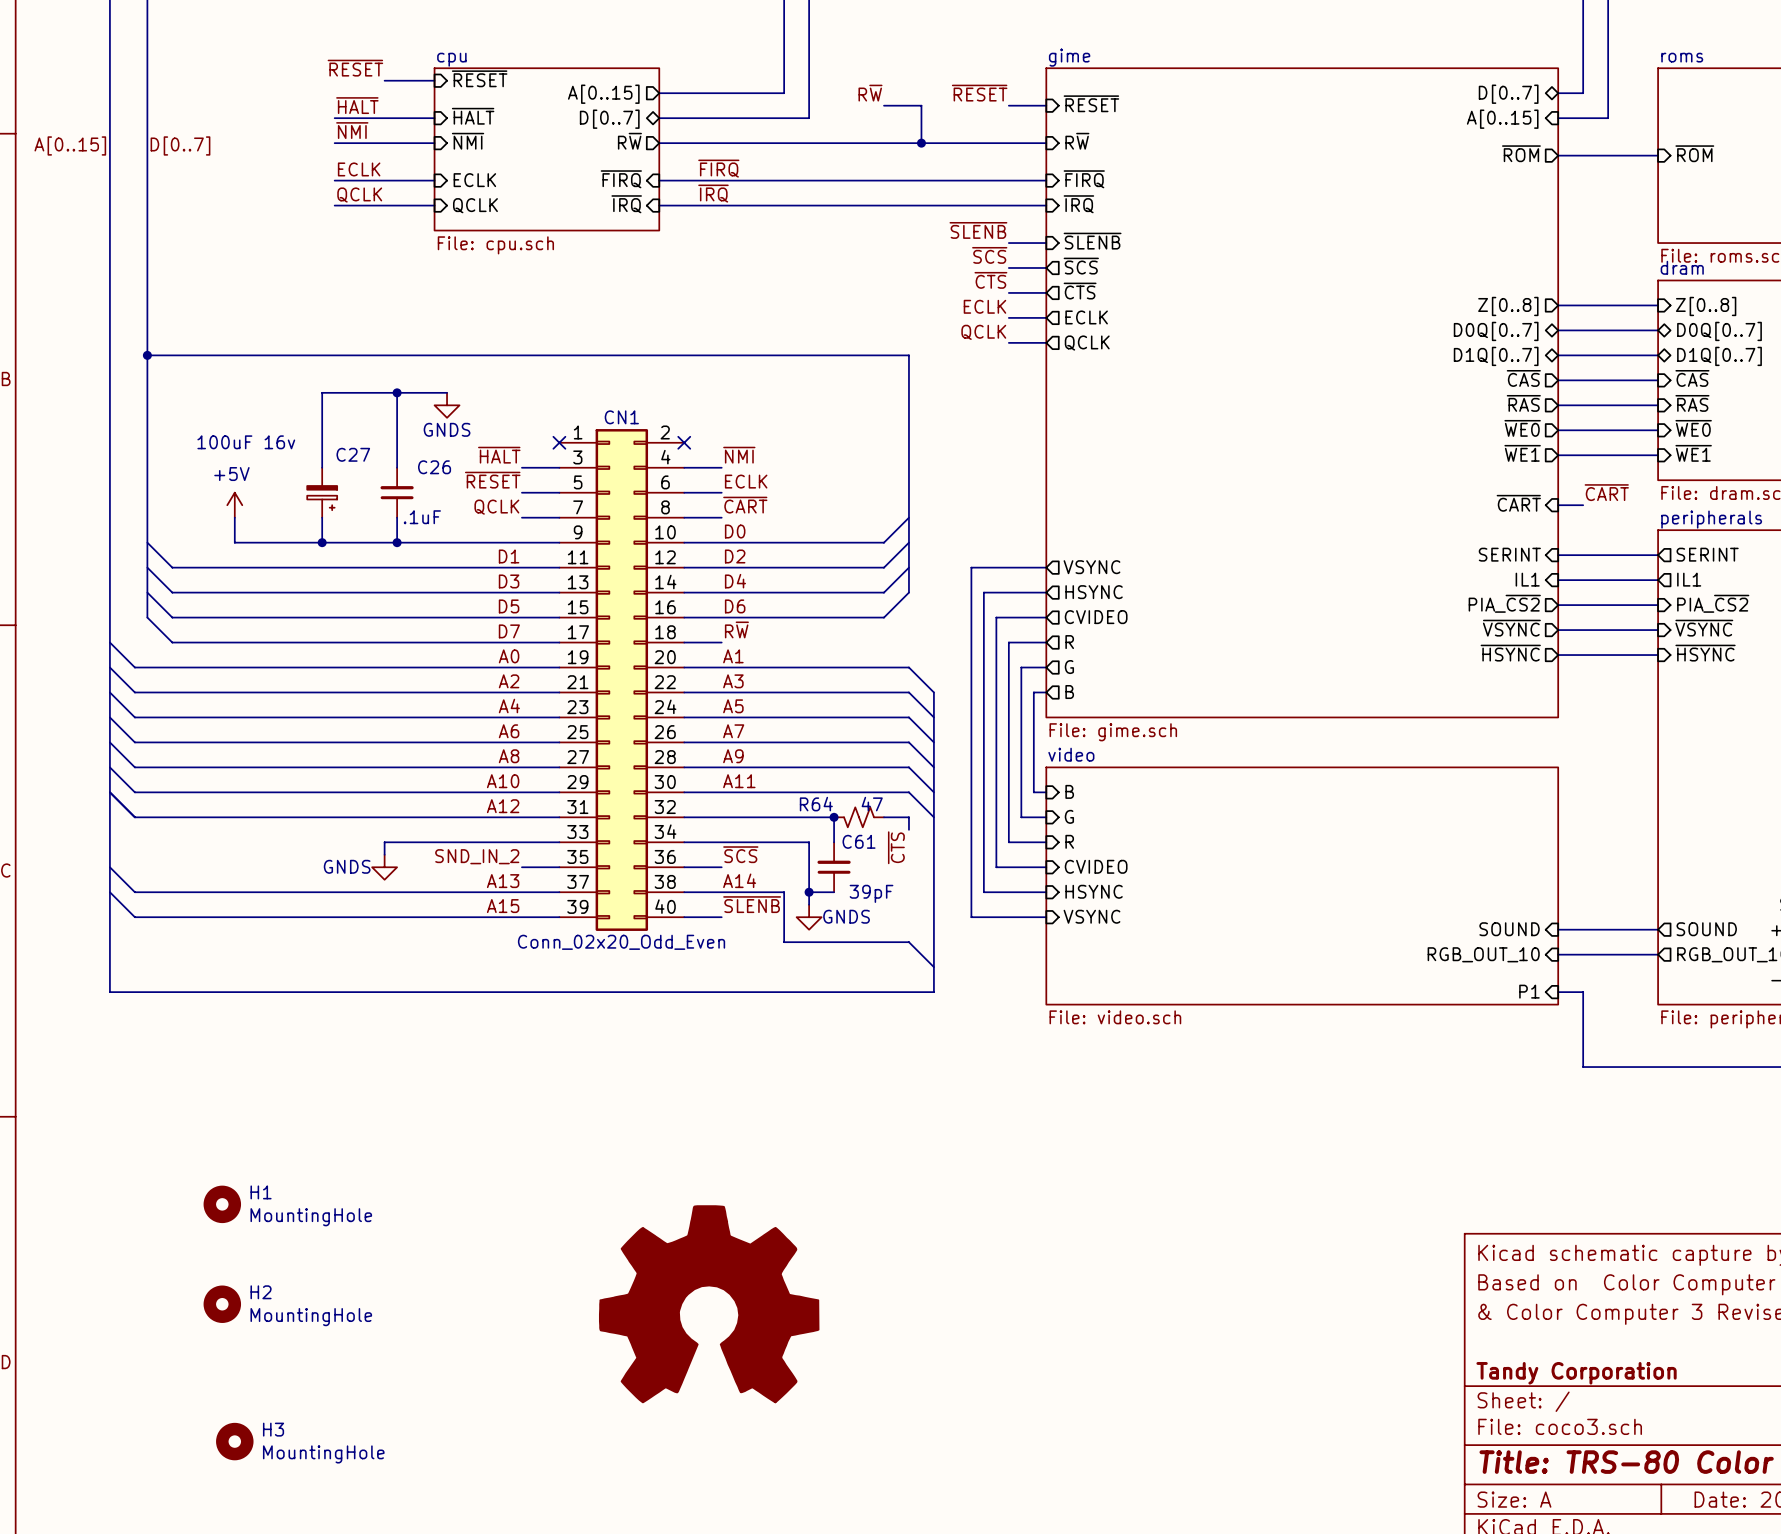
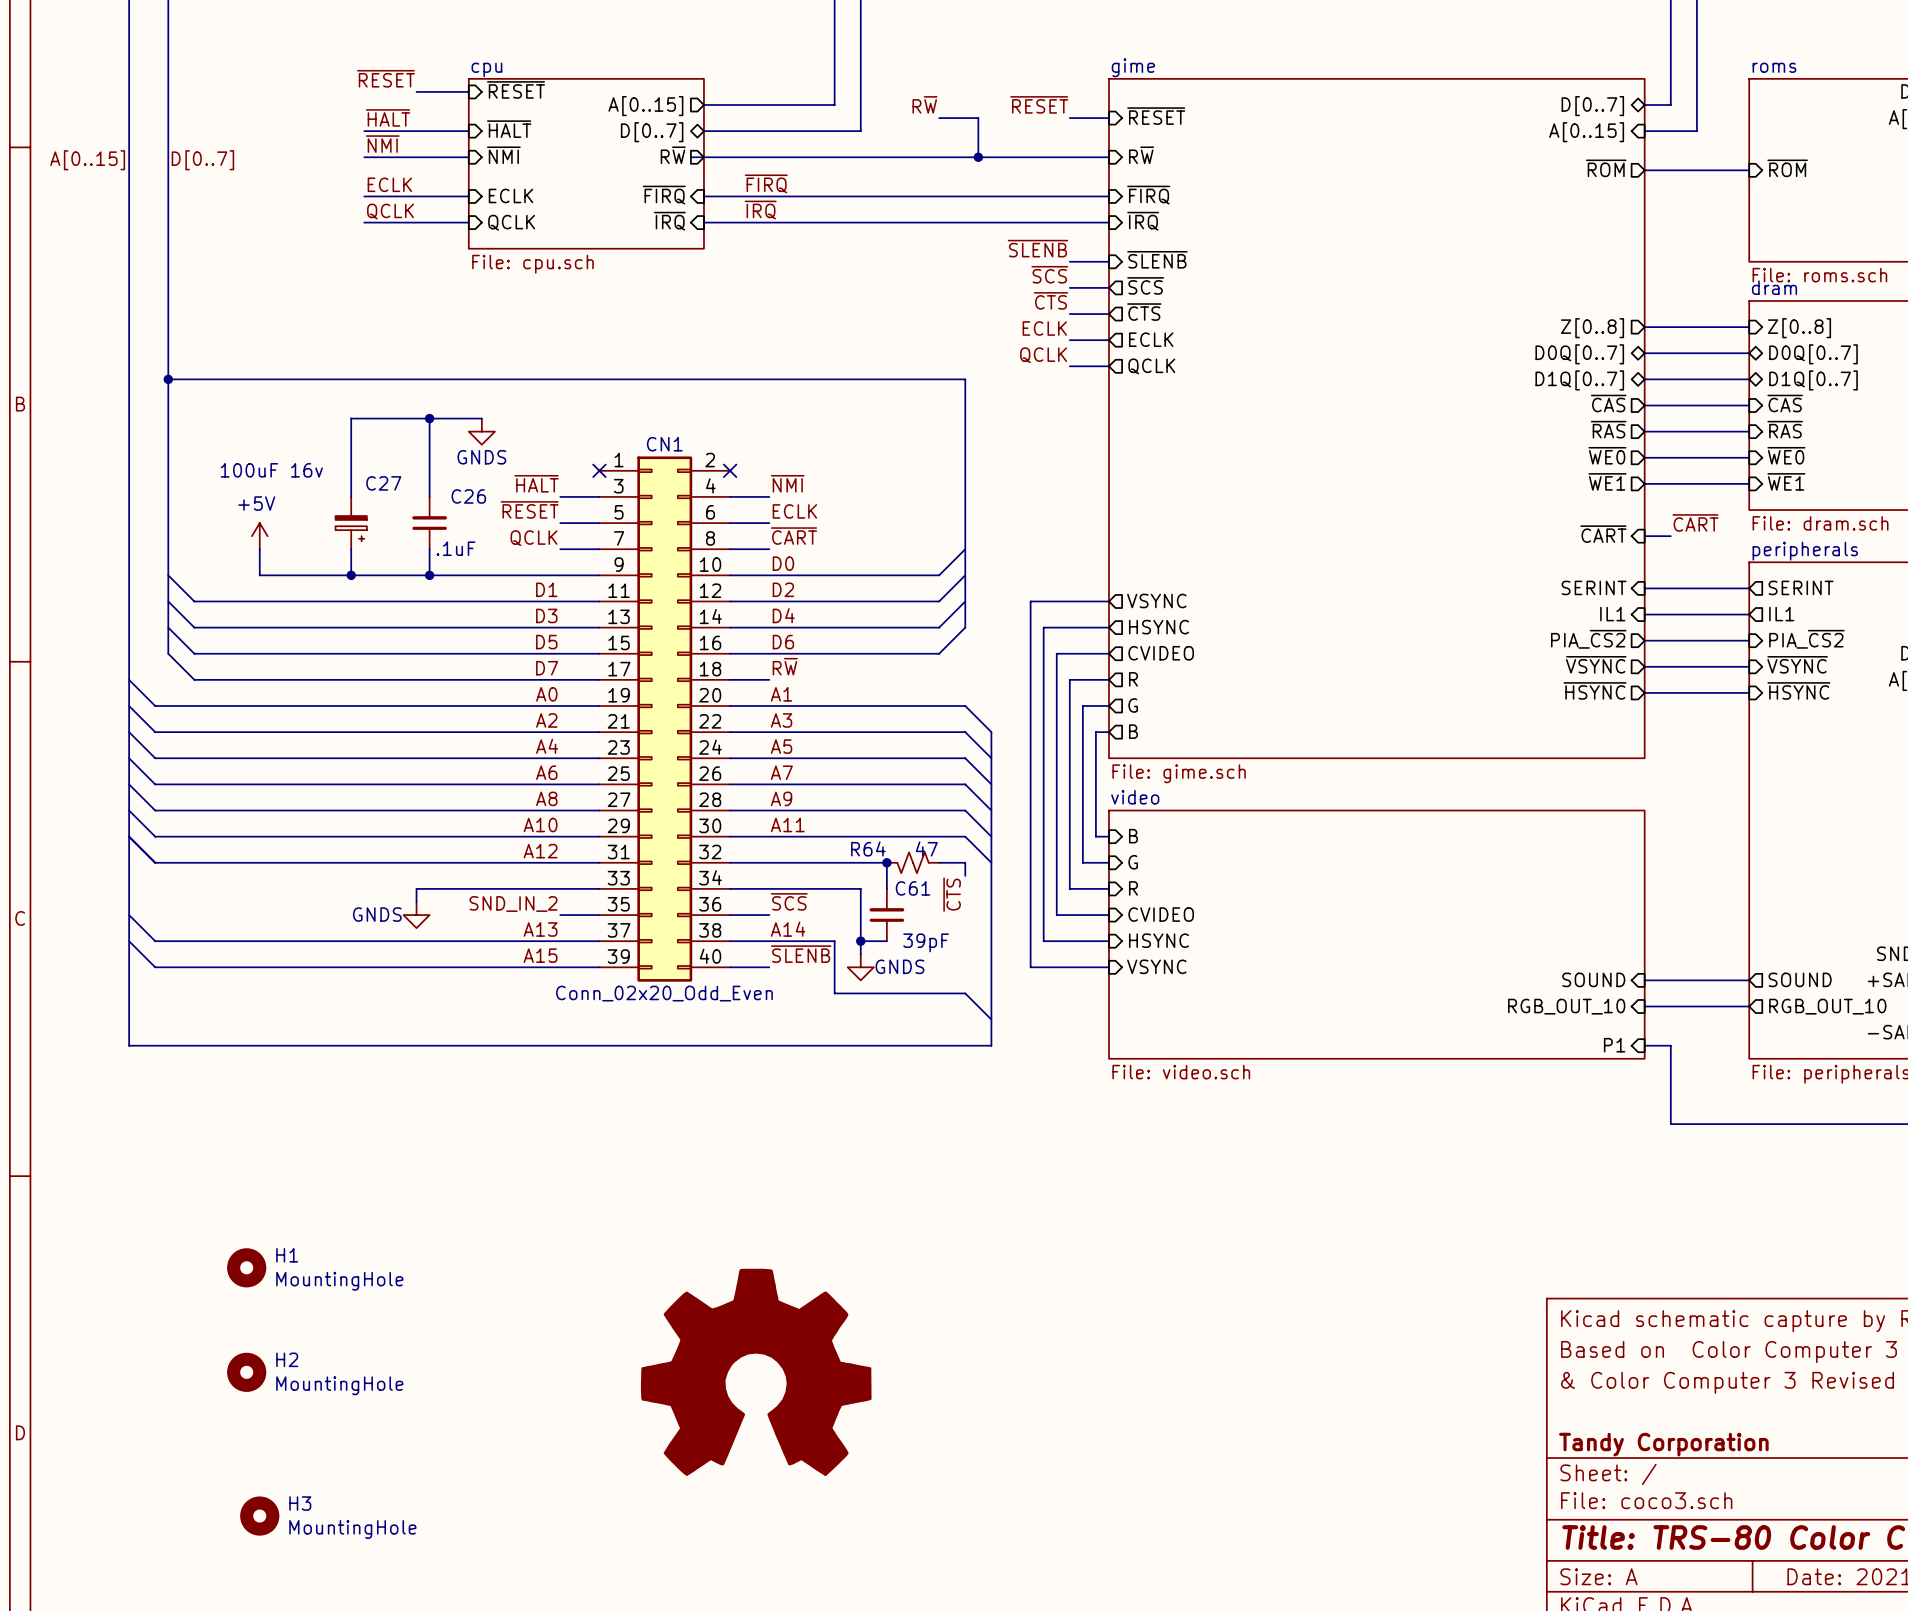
wire: none -> (690, 157) (703, 157)

